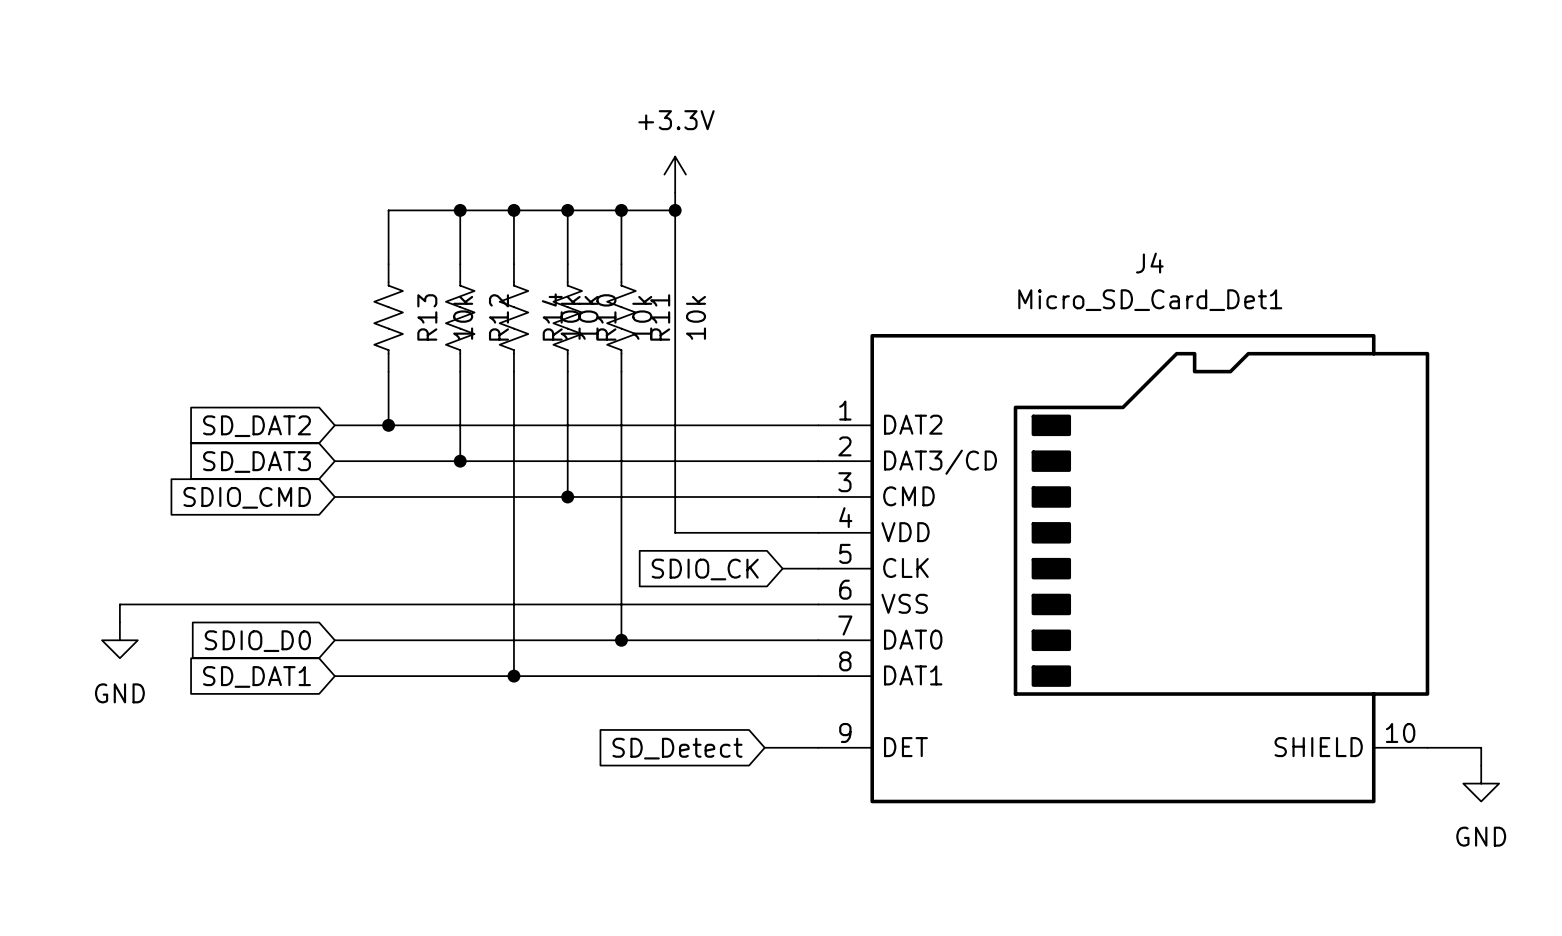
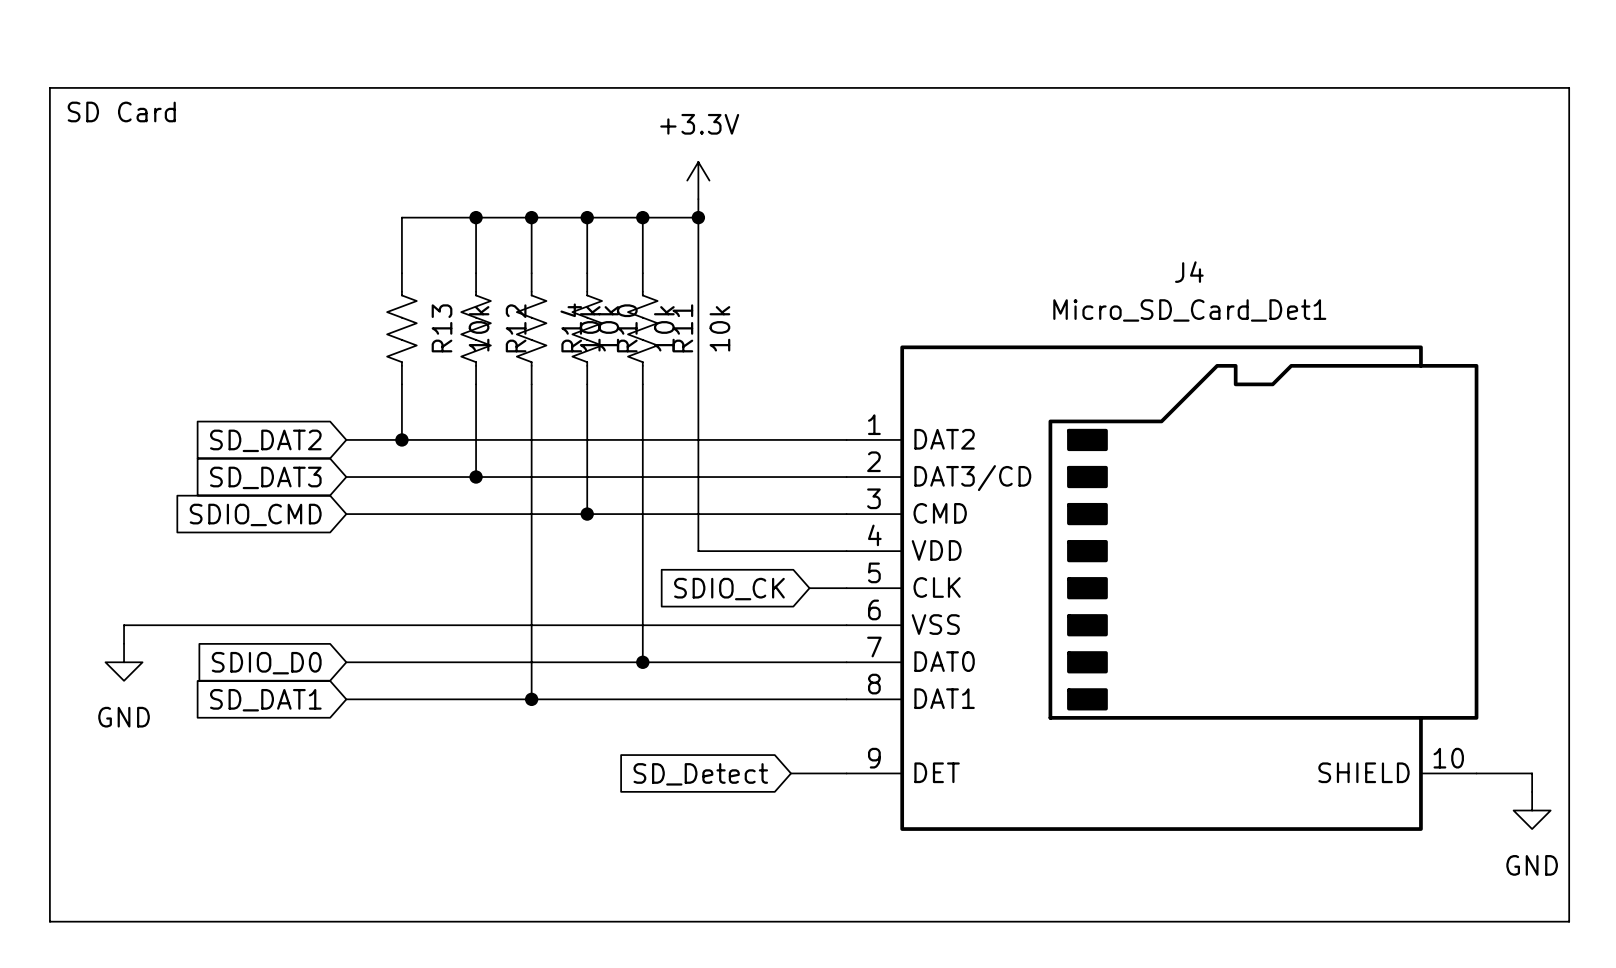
line: none -> (49, 87) (1569, 87) (1569, 921) (49, 921) (49, 87)
text: none -> SD Card (121, 111)

